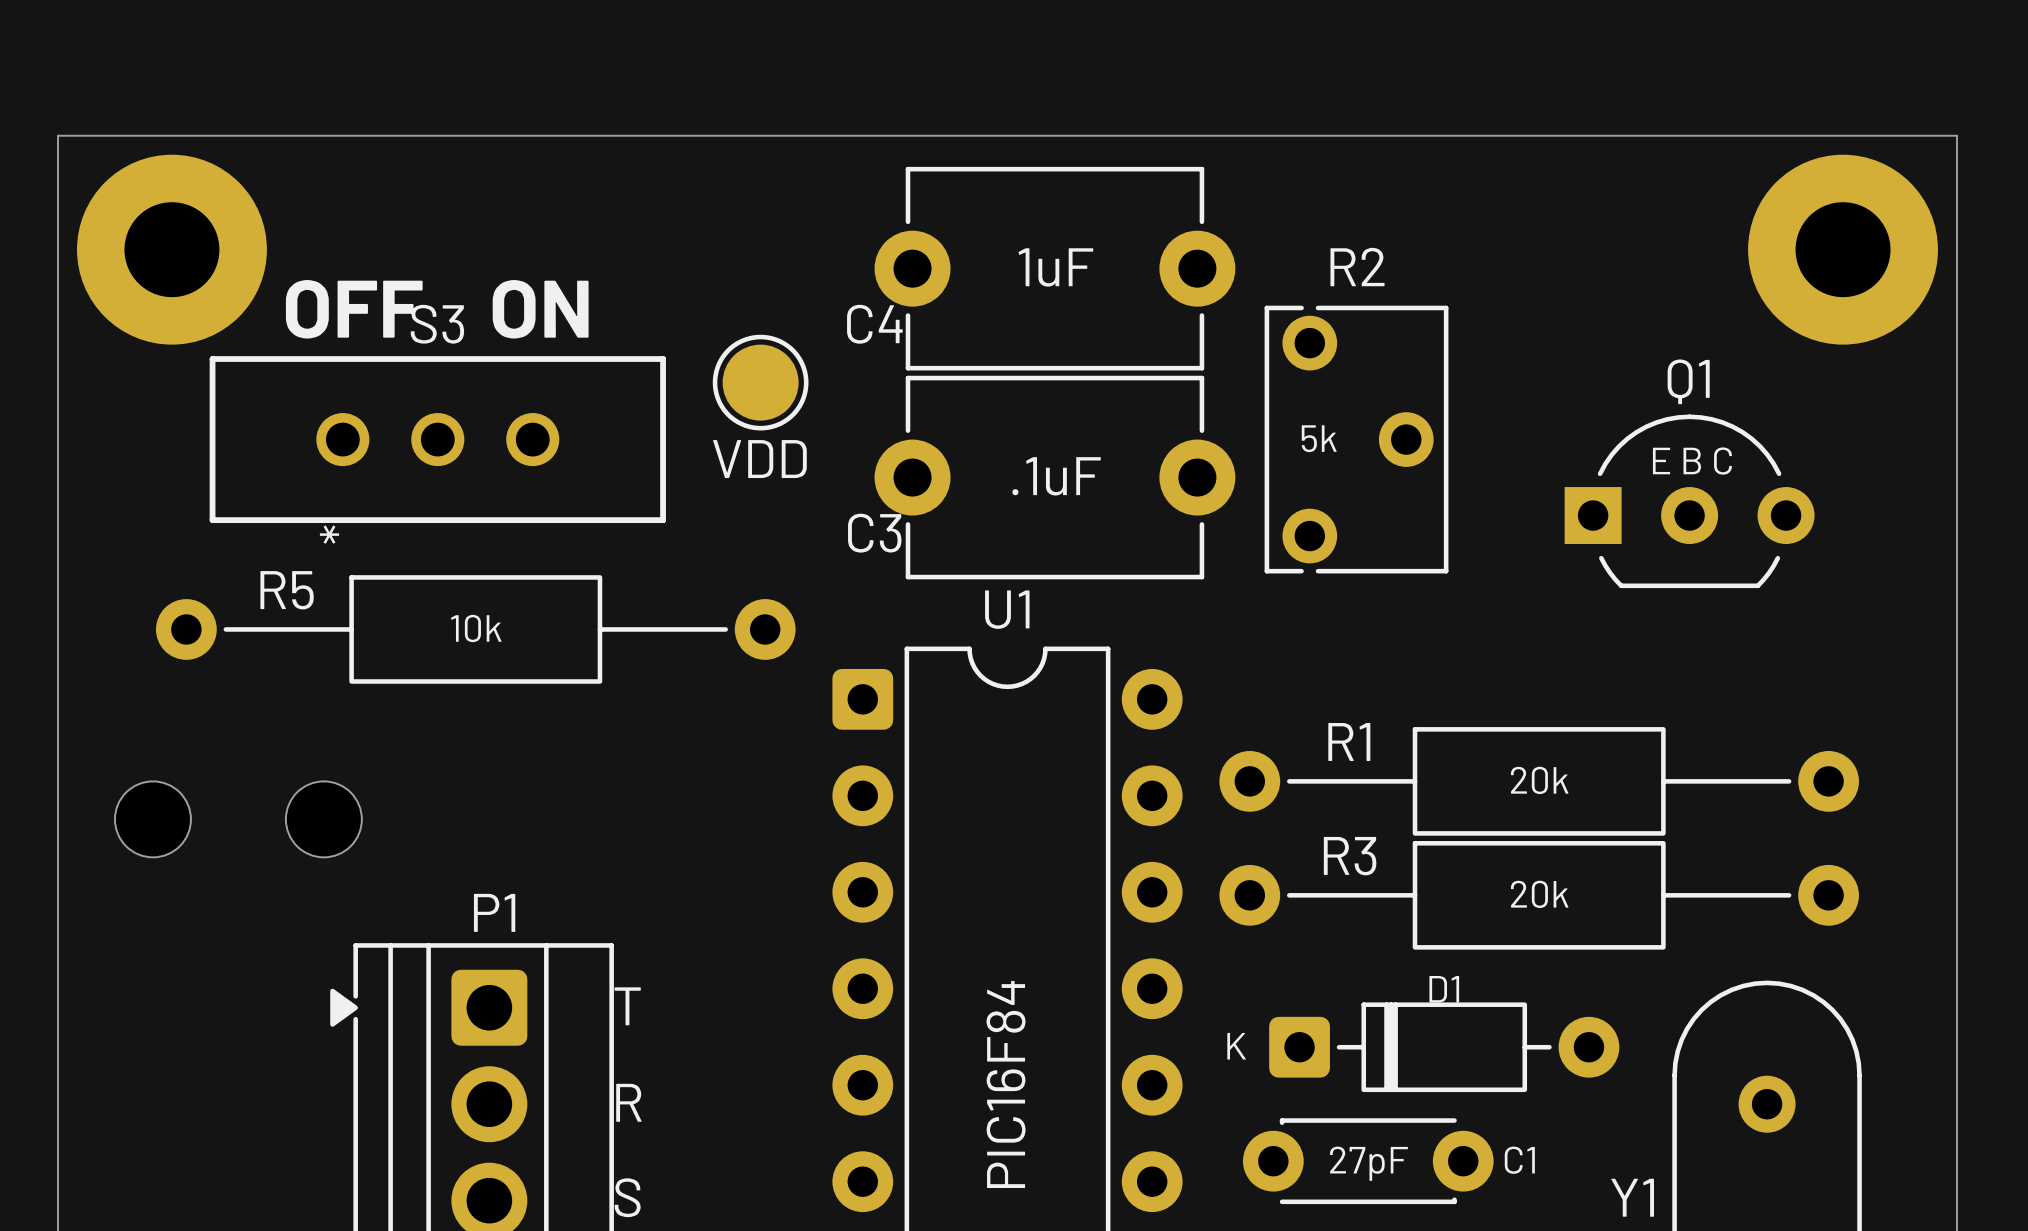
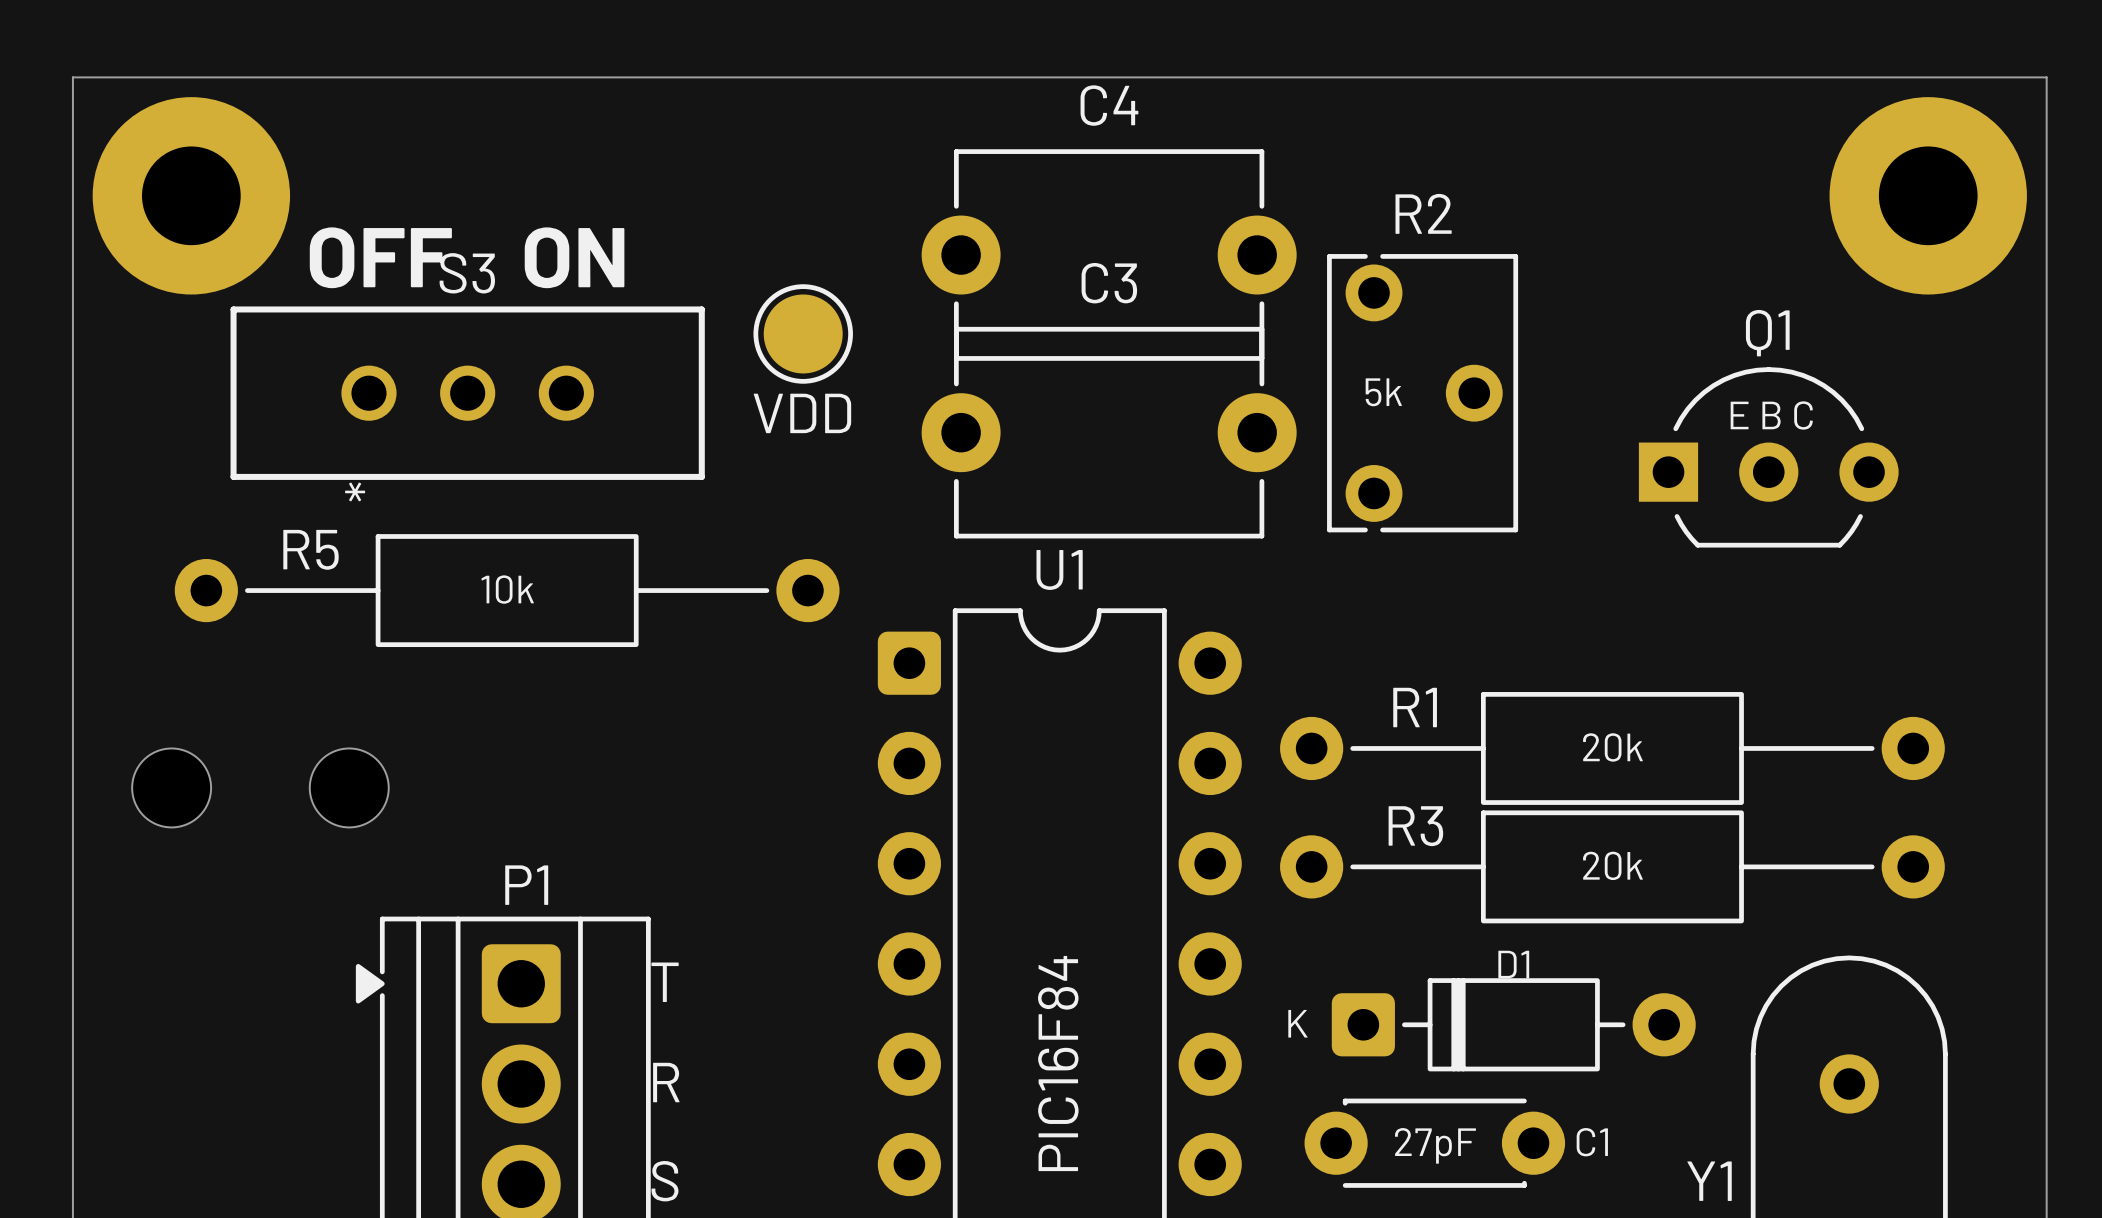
C4 value: 1uF (1055, 267) -> none
C4 position: (1054, 268) -> (1109, 255)
C4 name position: C4 (874, 324) -> C4 (1109, 105)
C3 value: .1uF (1056, 476) -> none
C3 name position: C3 (874, 533) -> C3 (1109, 283)

